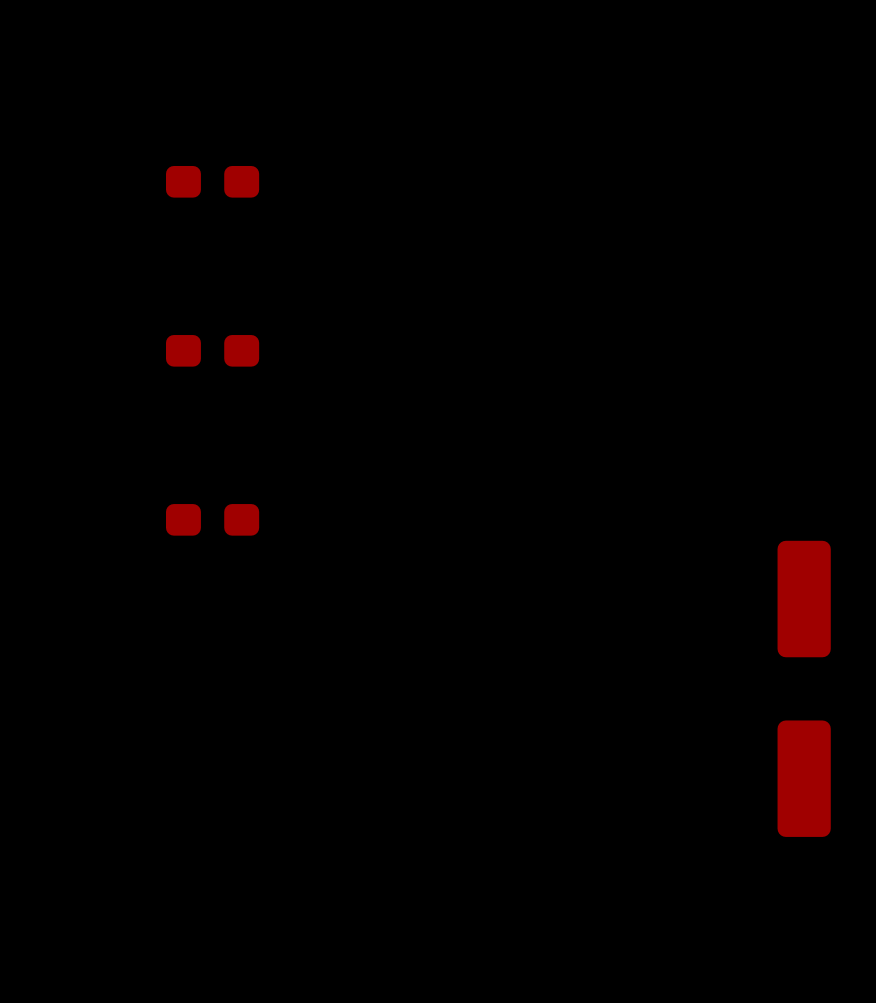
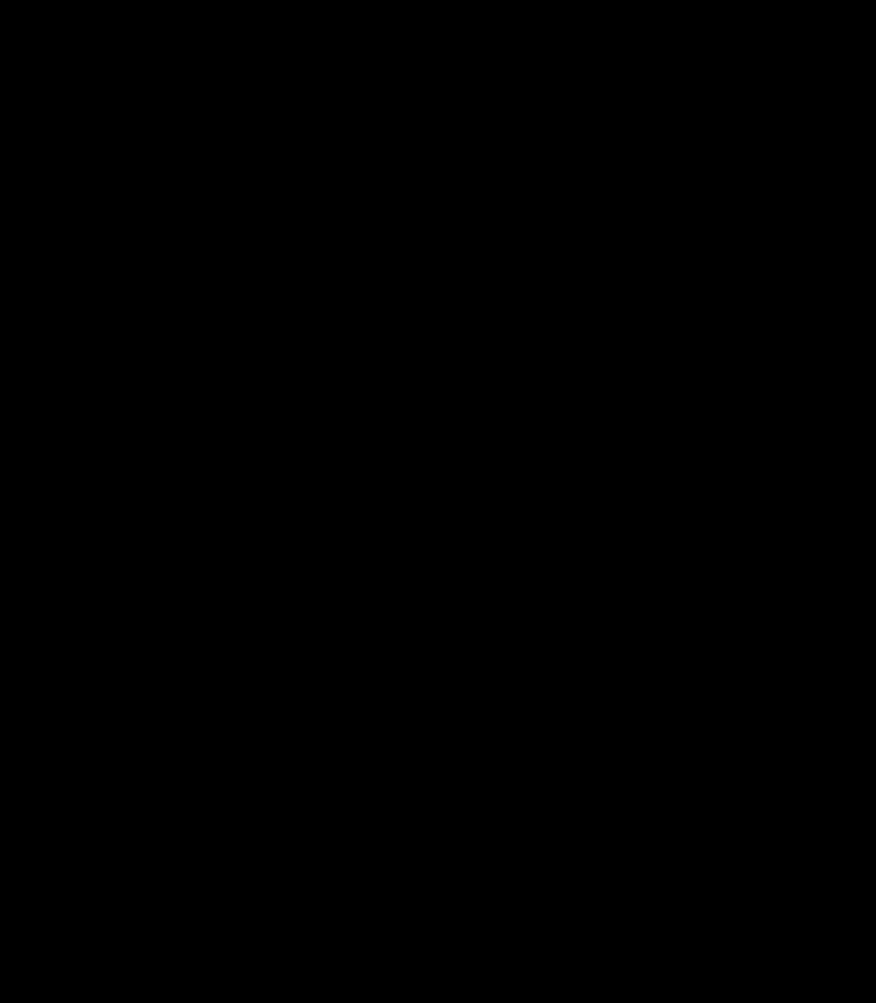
part: (212, 181) -> none
part: (212, 350) -> none
part: (212, 519) -> none
part: (804, 688) -> none

